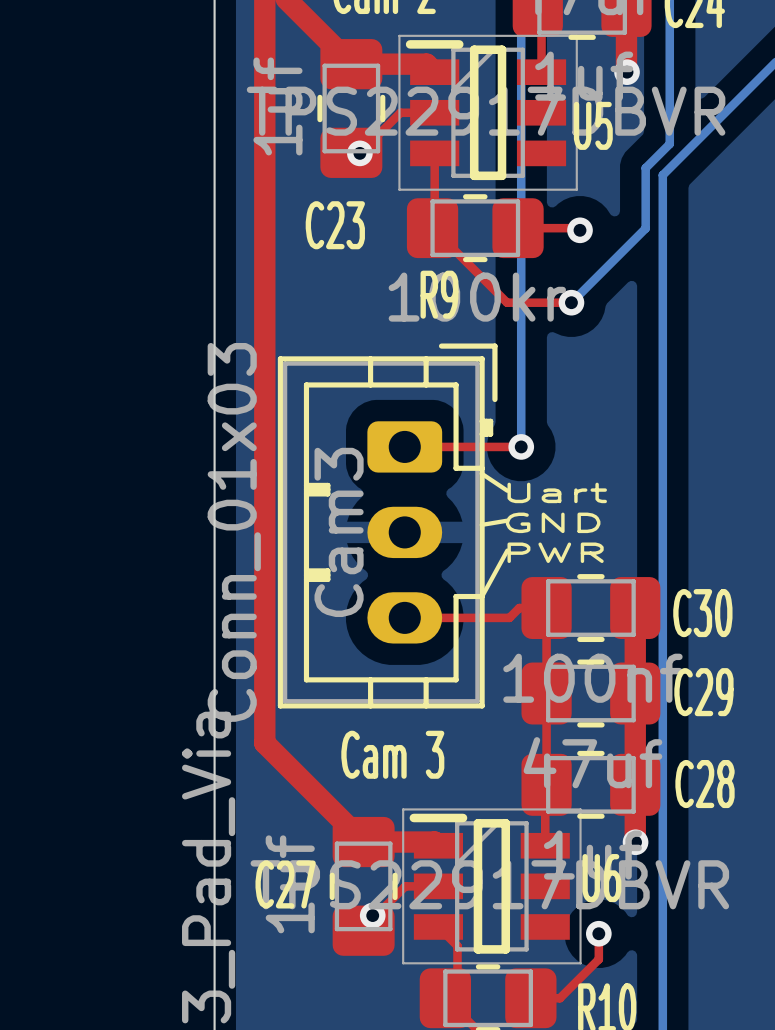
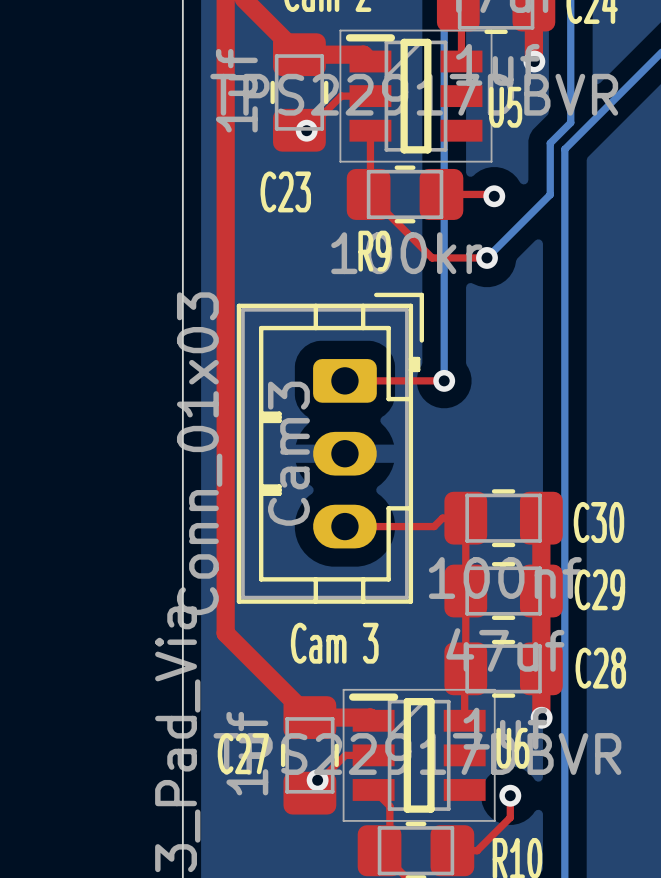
line: (481, 473) (507, 490) -> none
text: Uart (557, 492) -> none
line: (507, 520) (481, 524) -> none
text: GND (553, 522) -> none
line: (507, 550) (482, 596) -> none
text: PWR (555, 552) -> none

